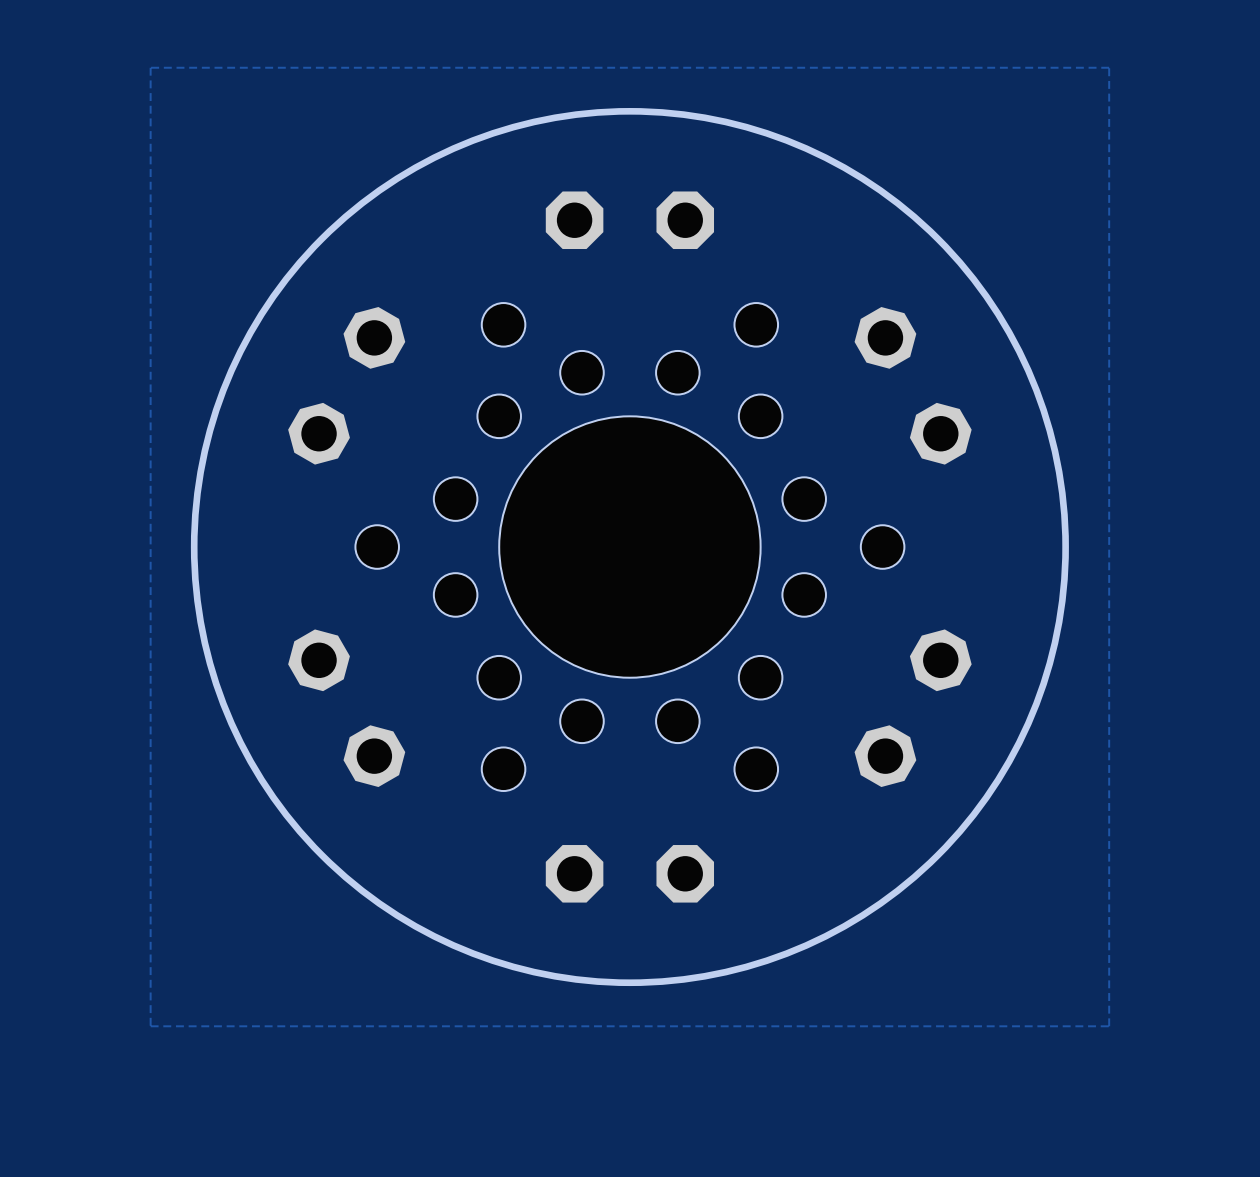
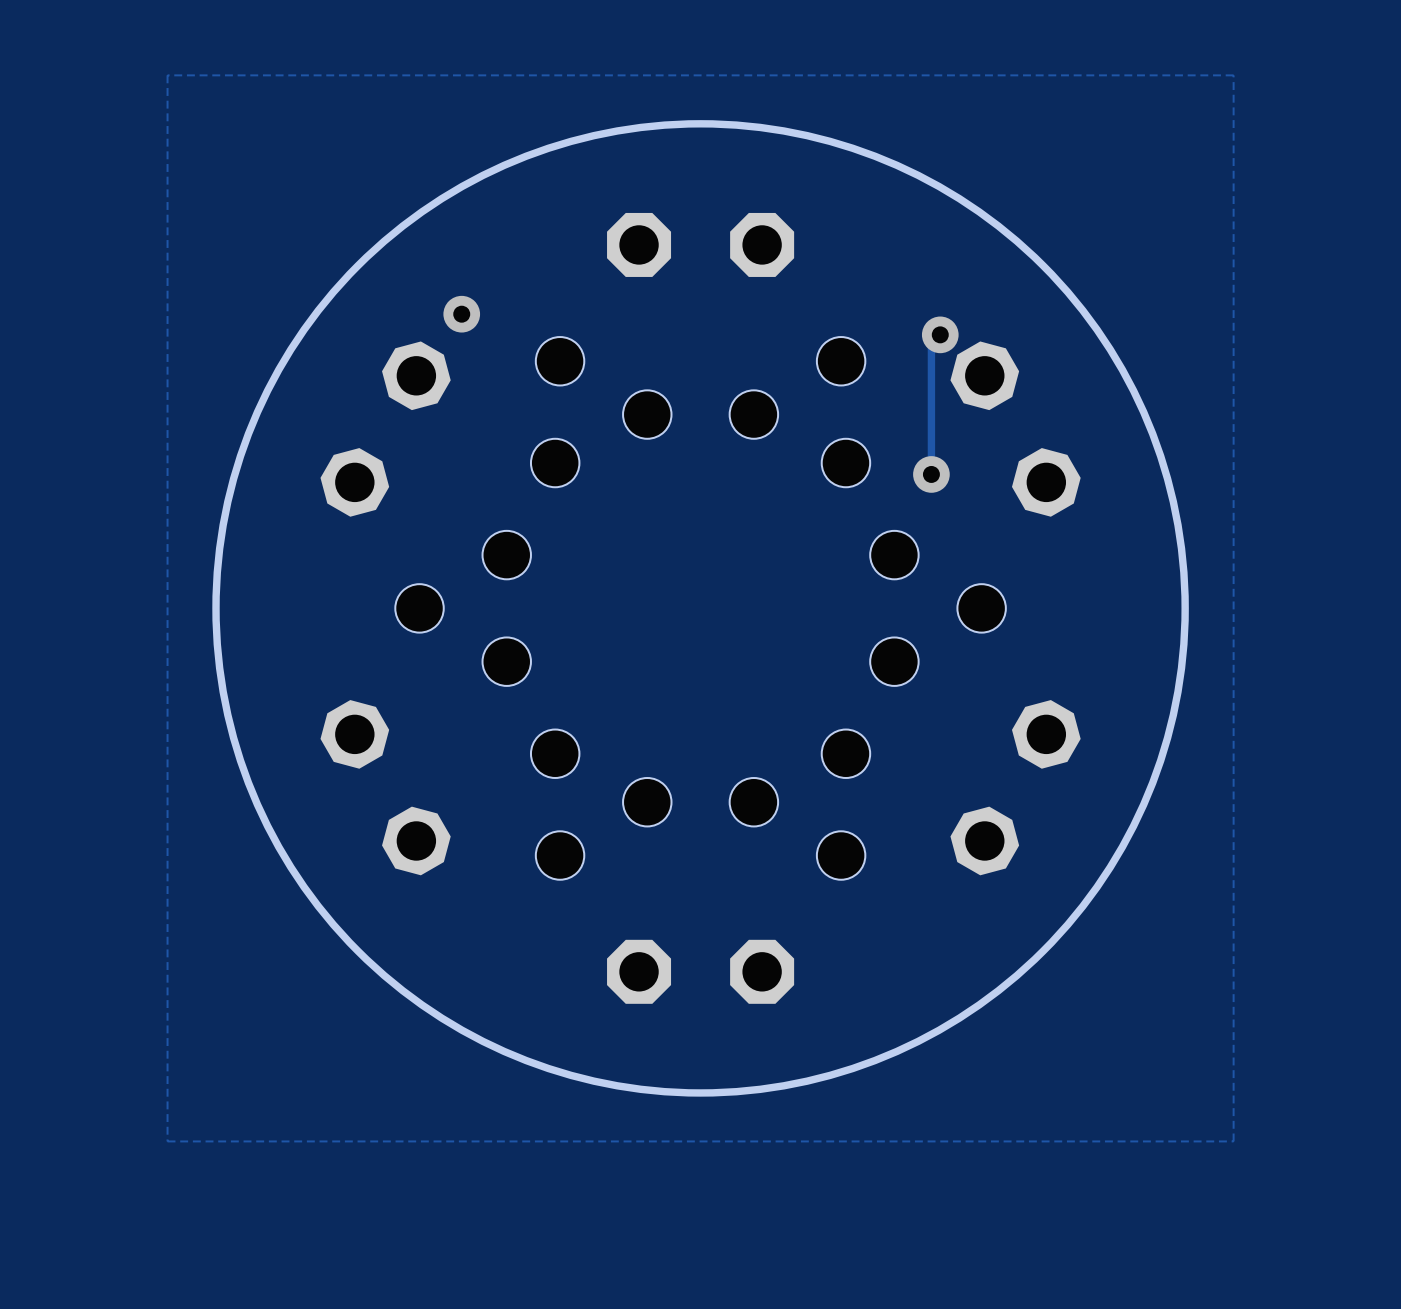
via: none -> (461, 314)
track: none -> (940, 334) (931, 343) (931, 474)
via: none -> (940, 334)
via: none -> (931, 474)
hole: (629, 547) -> none

